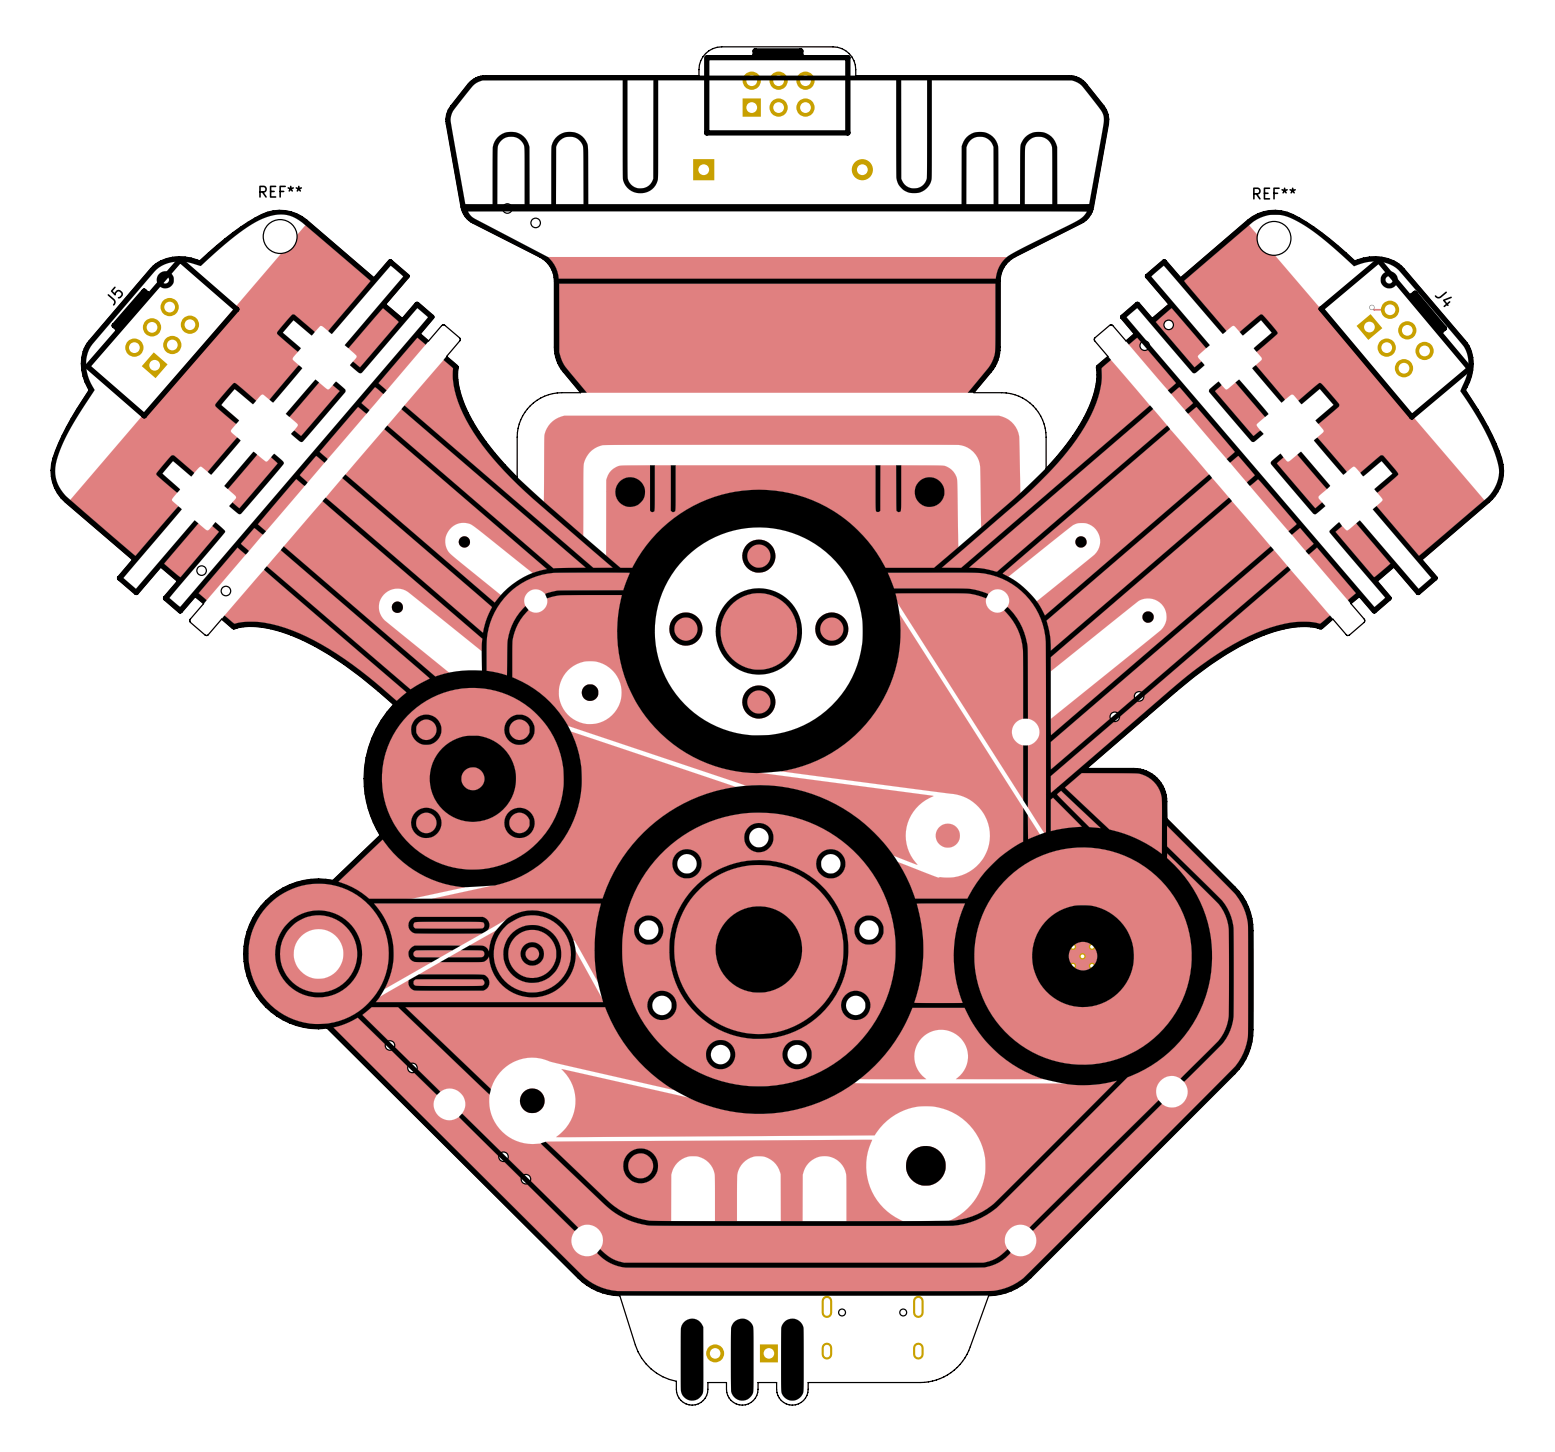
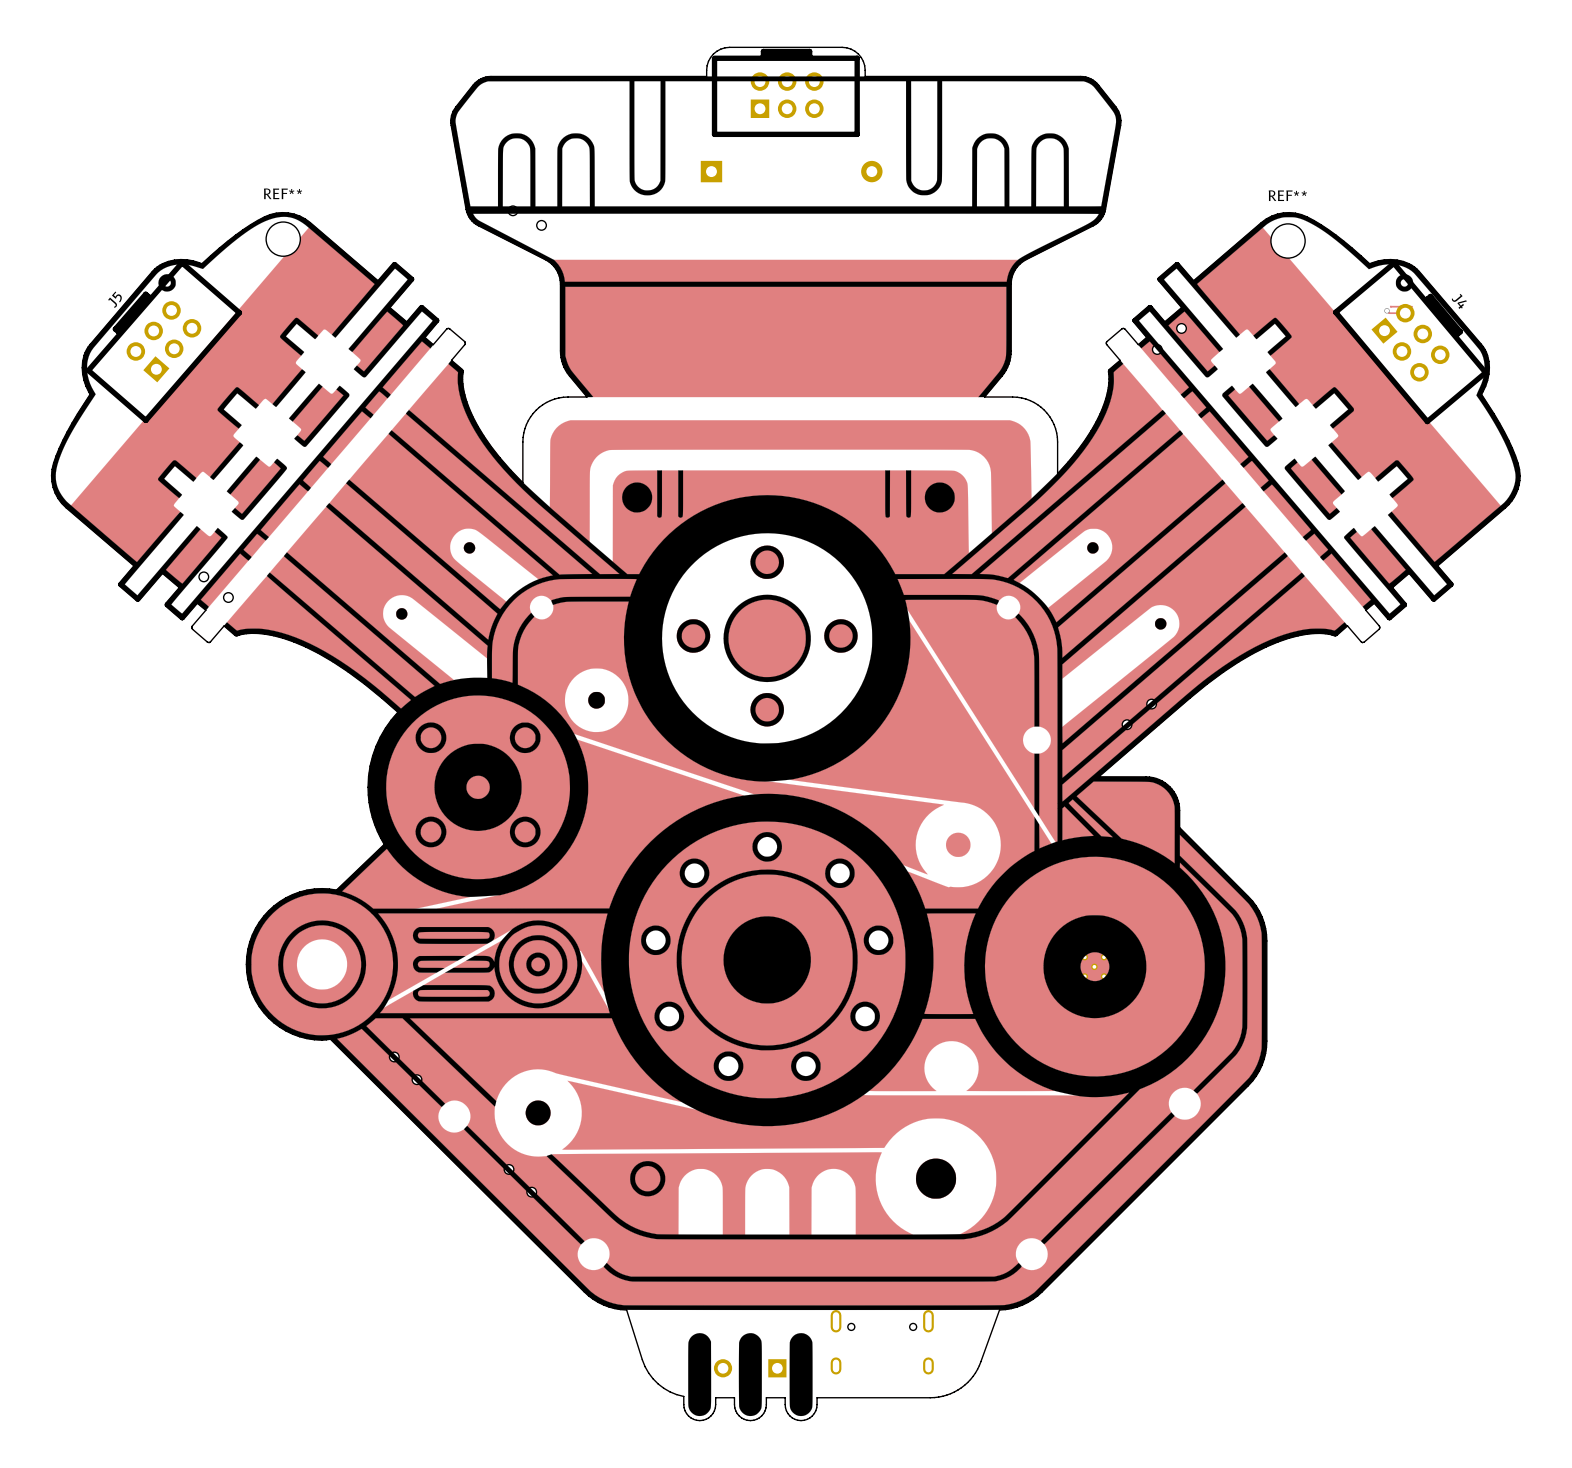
track: none -> (1390, 306) (1412, 306)

